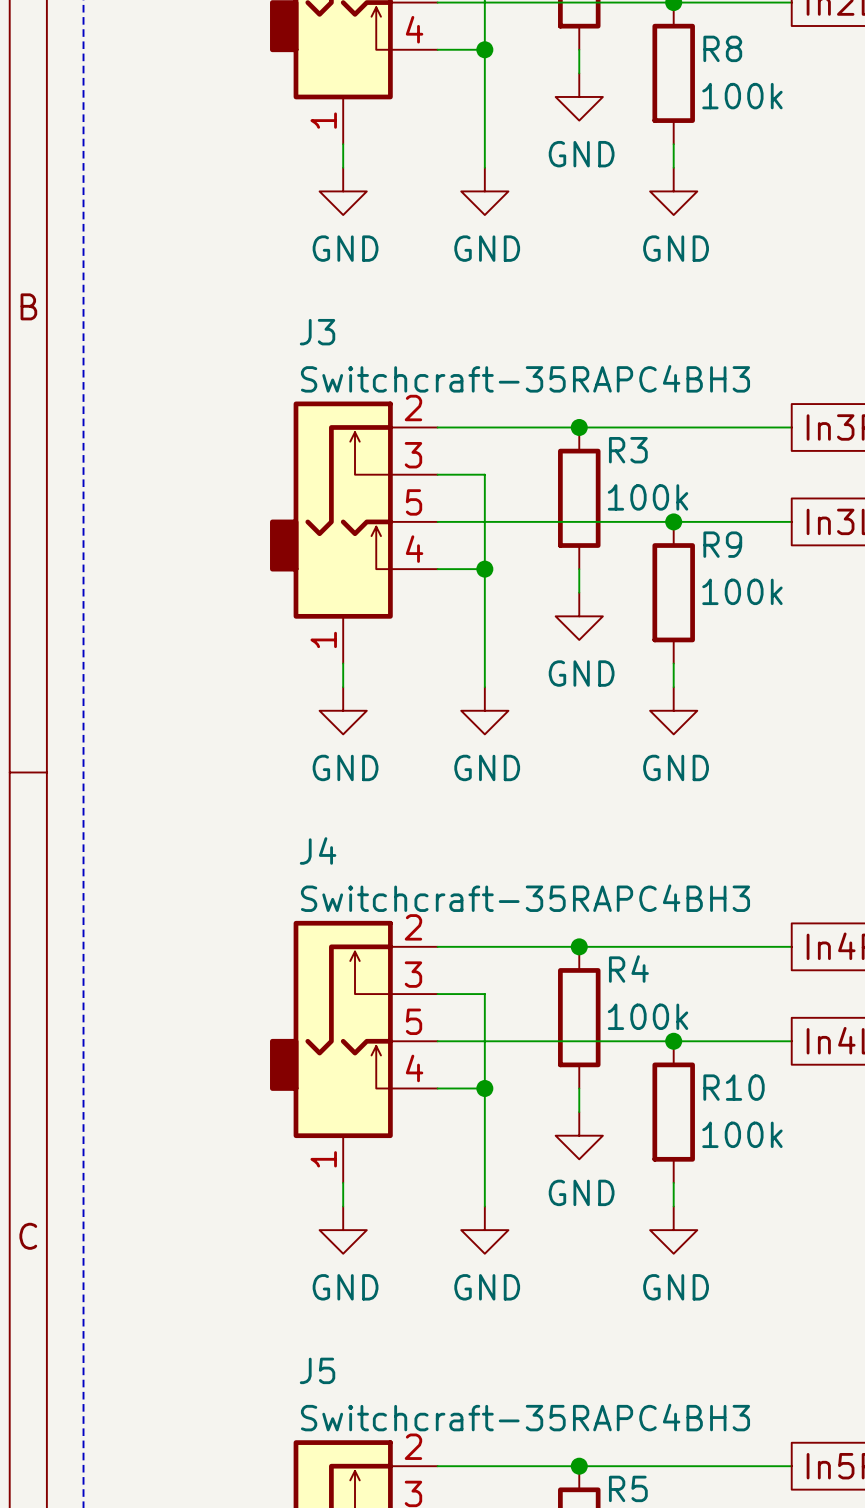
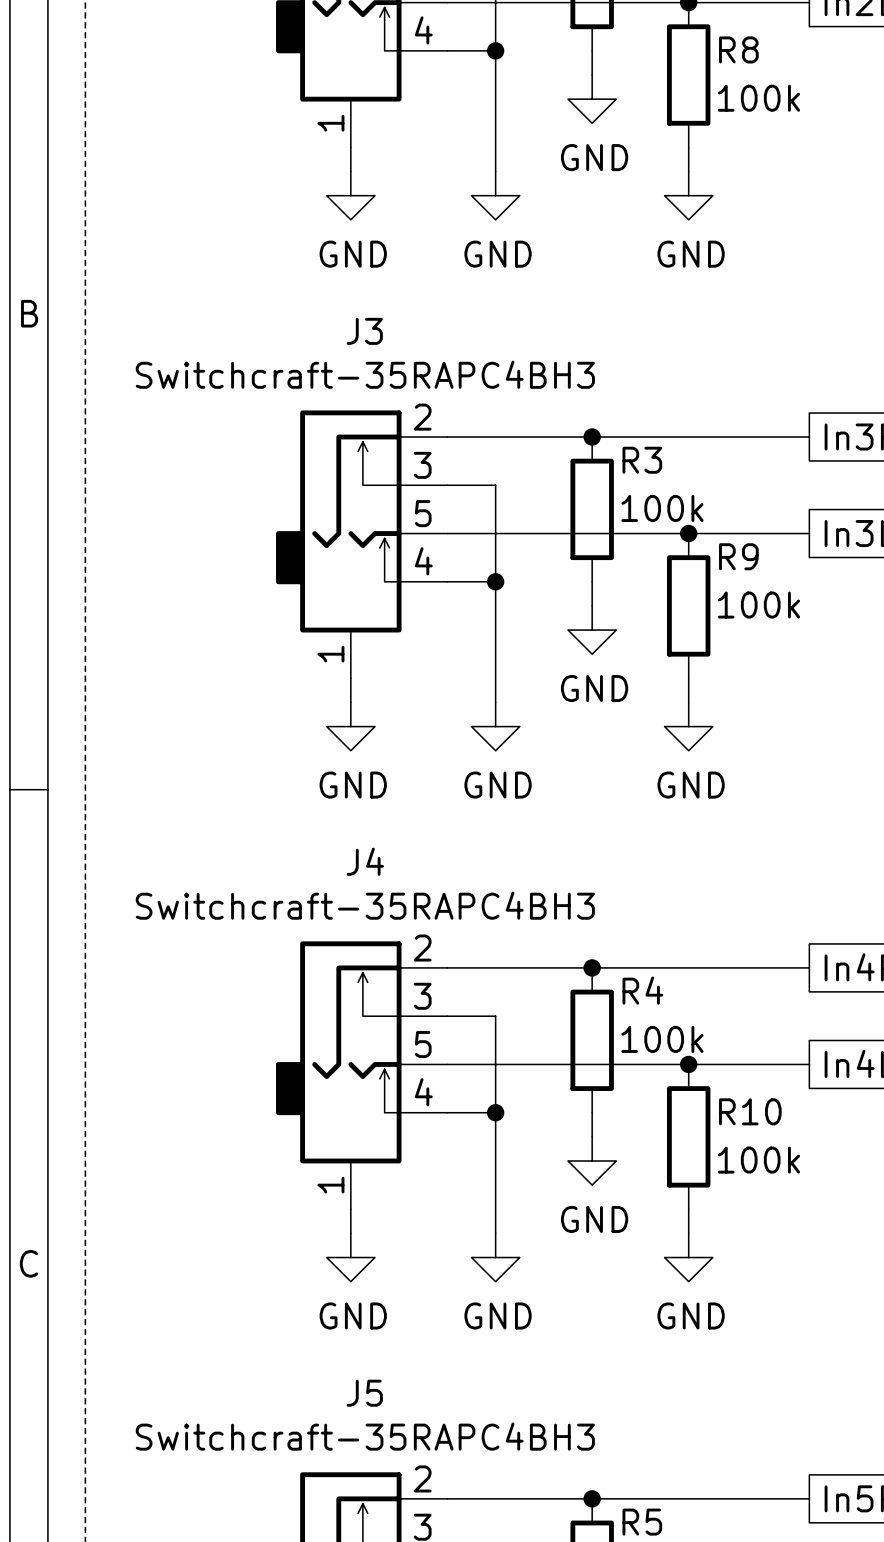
J3 name position: J3 (317, 332) -> J3 (364, 331)
J3 value position: Switchcraft-35RAPC4BH3 (525, 378) -> Switchcraft-35RAPC4BH3 (365, 374)
J4 name position: J4 (318, 850) -> J4 (365, 861)
J4 value position: Switchcraft-35RAPC4BH3 (525, 898) -> Switchcraft-35RAPC4BH3 (365, 905)
J5 name position: J5 (317, 1370) -> J5 (364, 1393)
J5 value position: Switchcraft-35RAPC4BH3 (525, 1417) -> Switchcraft-35RAPC4BH3 (365, 1436)

